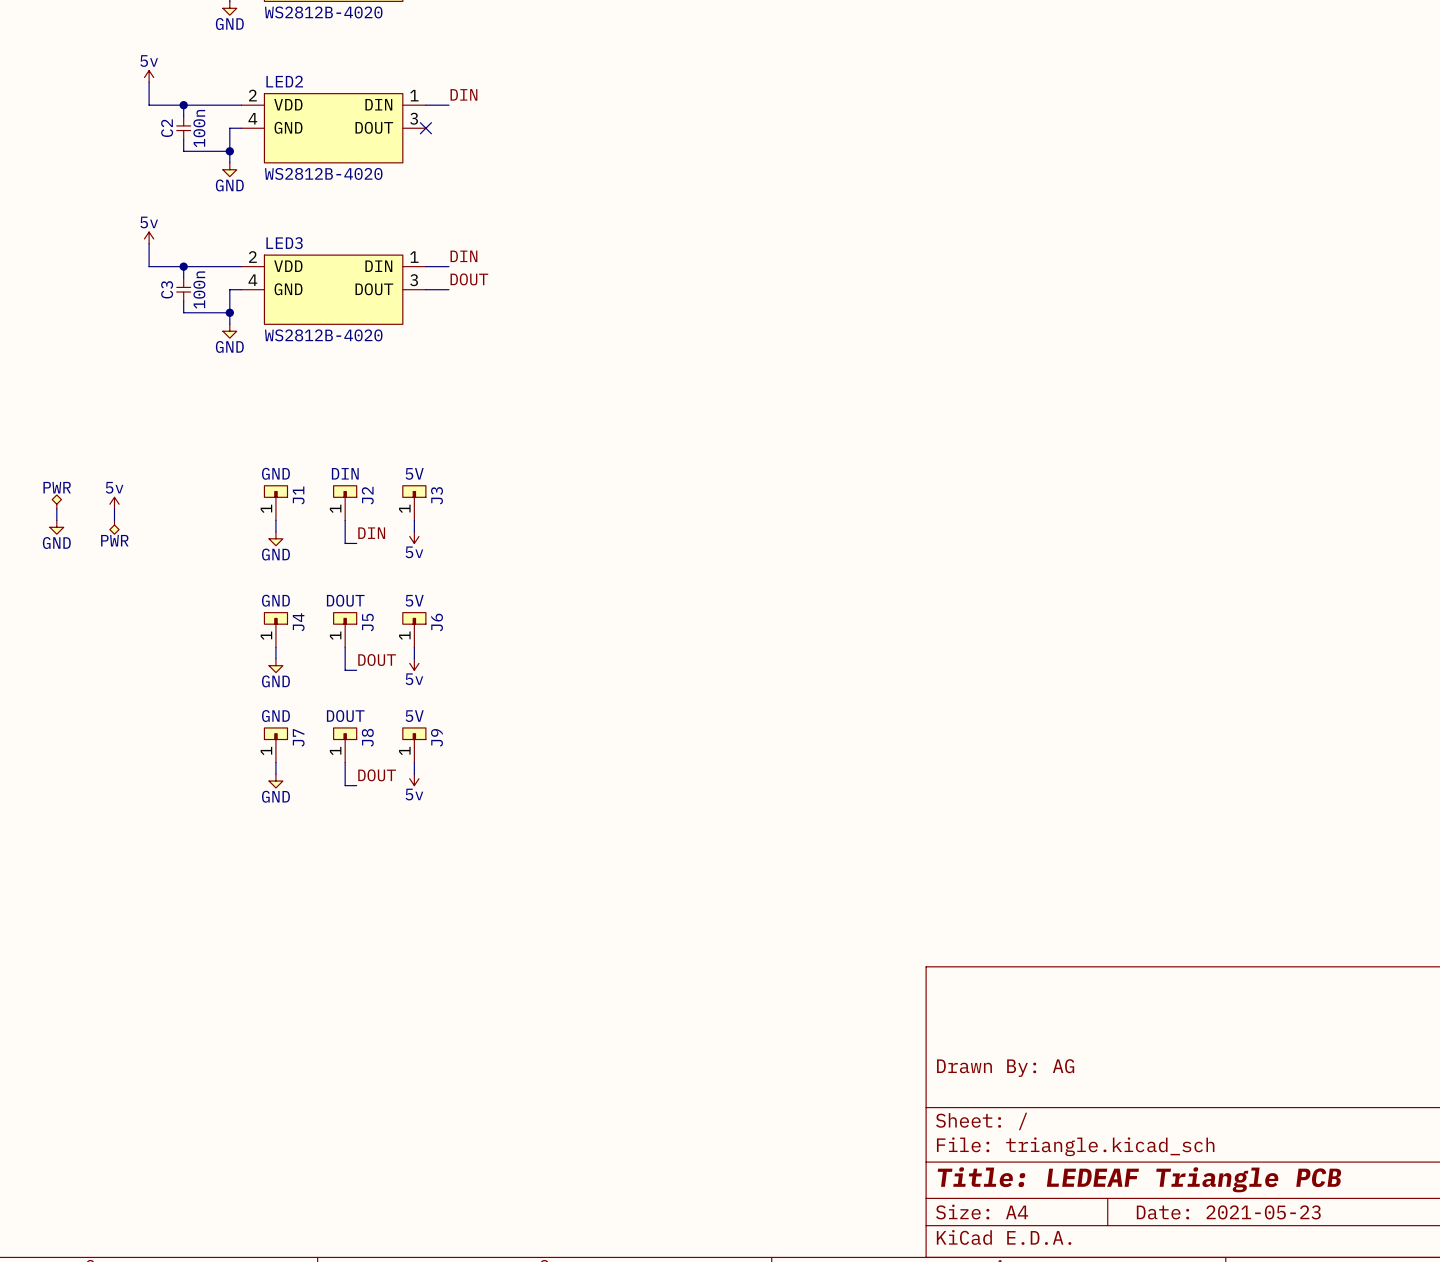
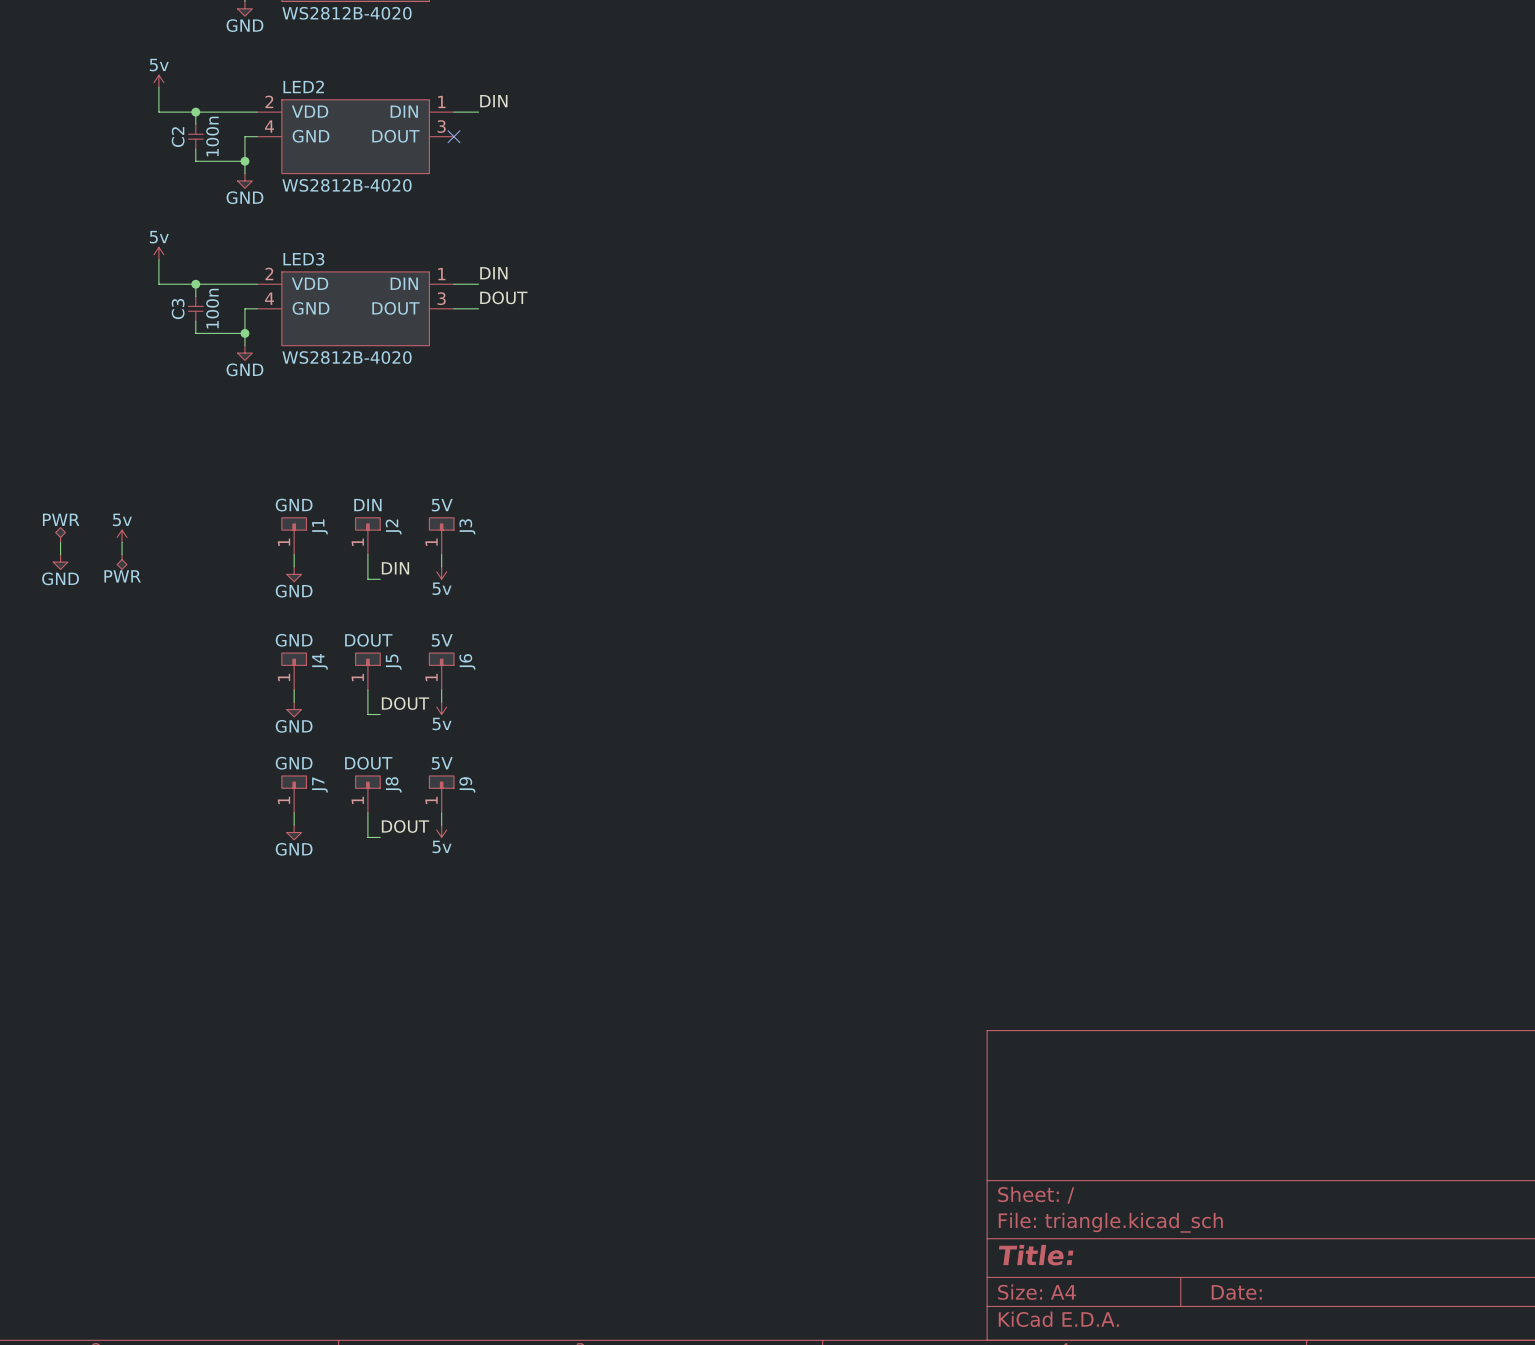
title block: Drawn By: AG (1005, 1068) -> none
title block: Title: LEDEAF Triangle PCB (1139, 1179) -> Title: (1036, 1255)
title block: Date: 2021-05-23 (1228, 1212) -> Date: (1236, 1292)

